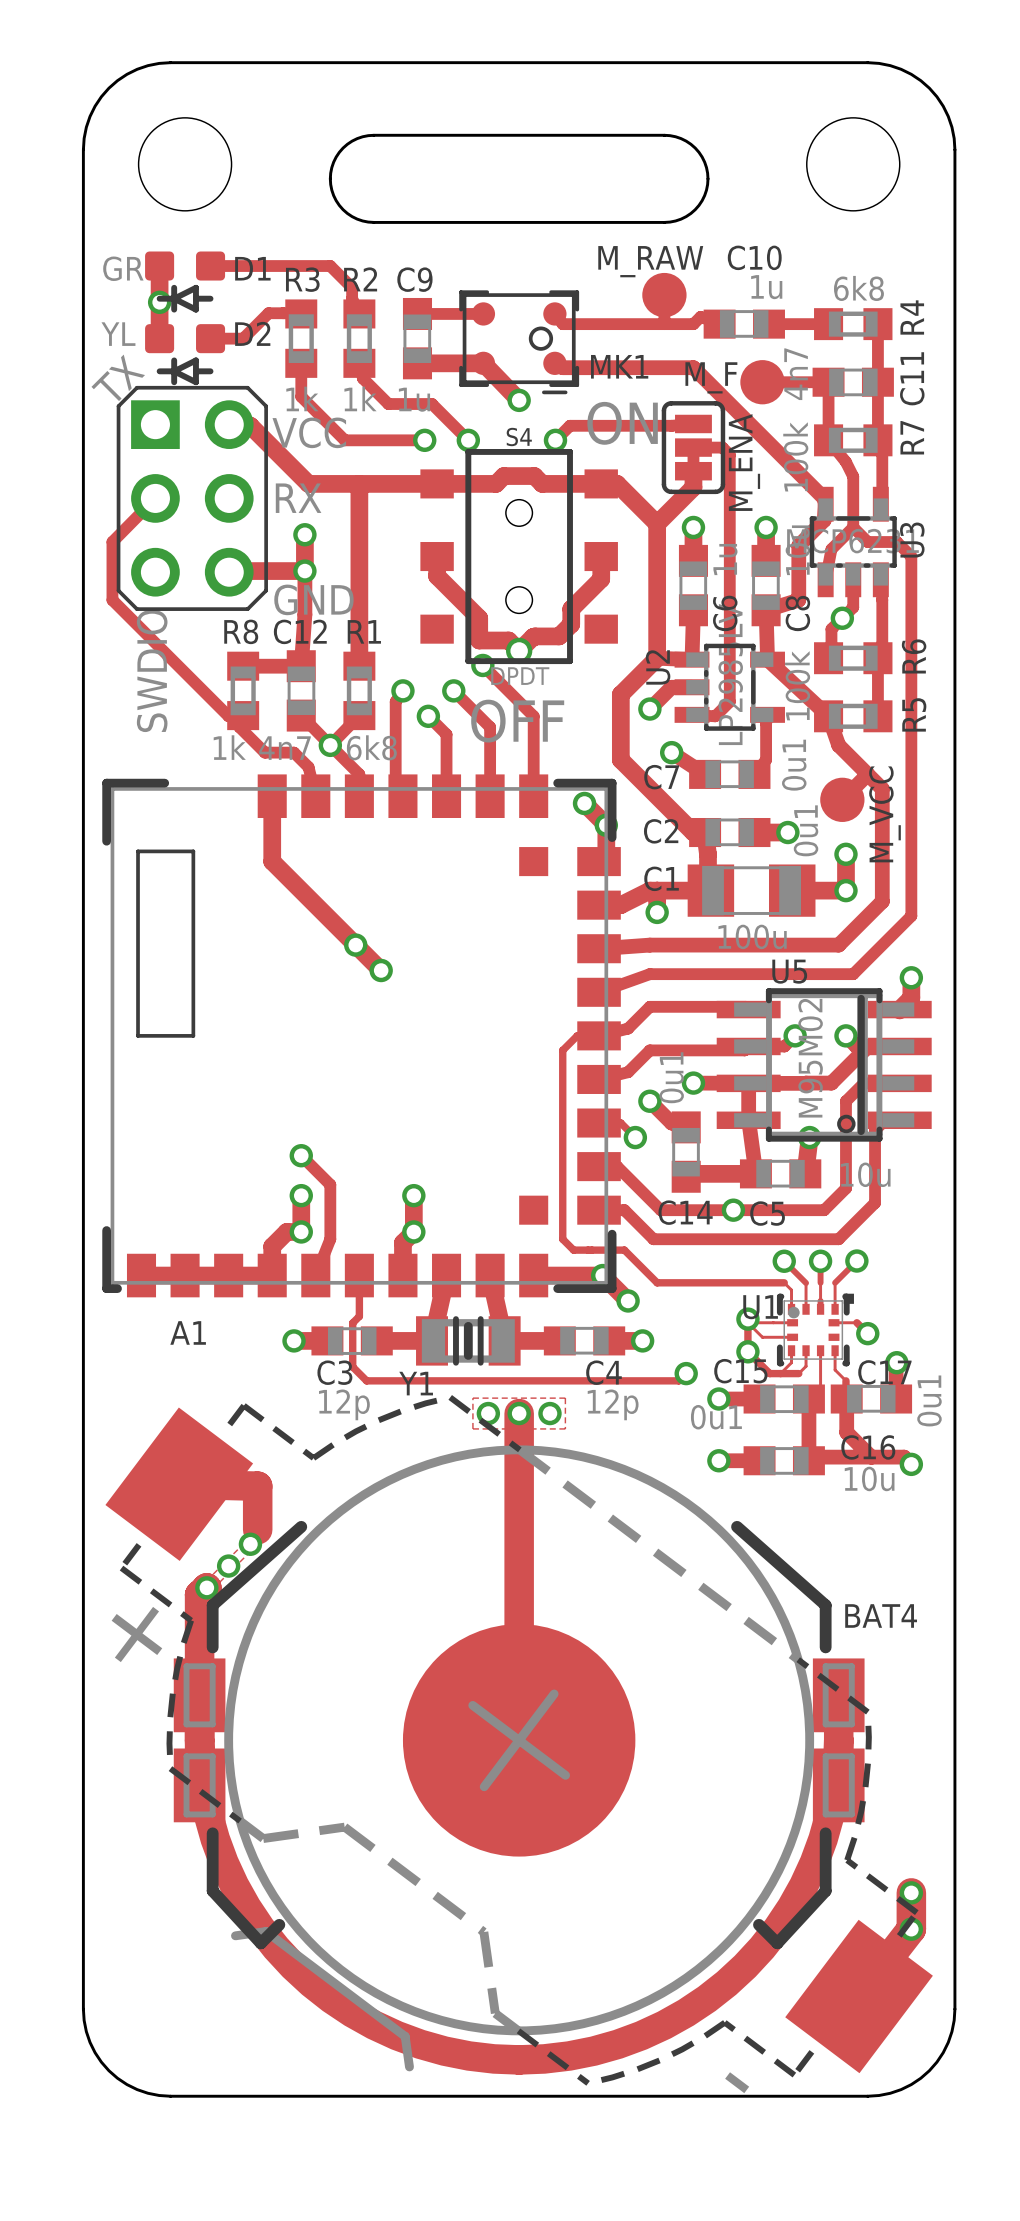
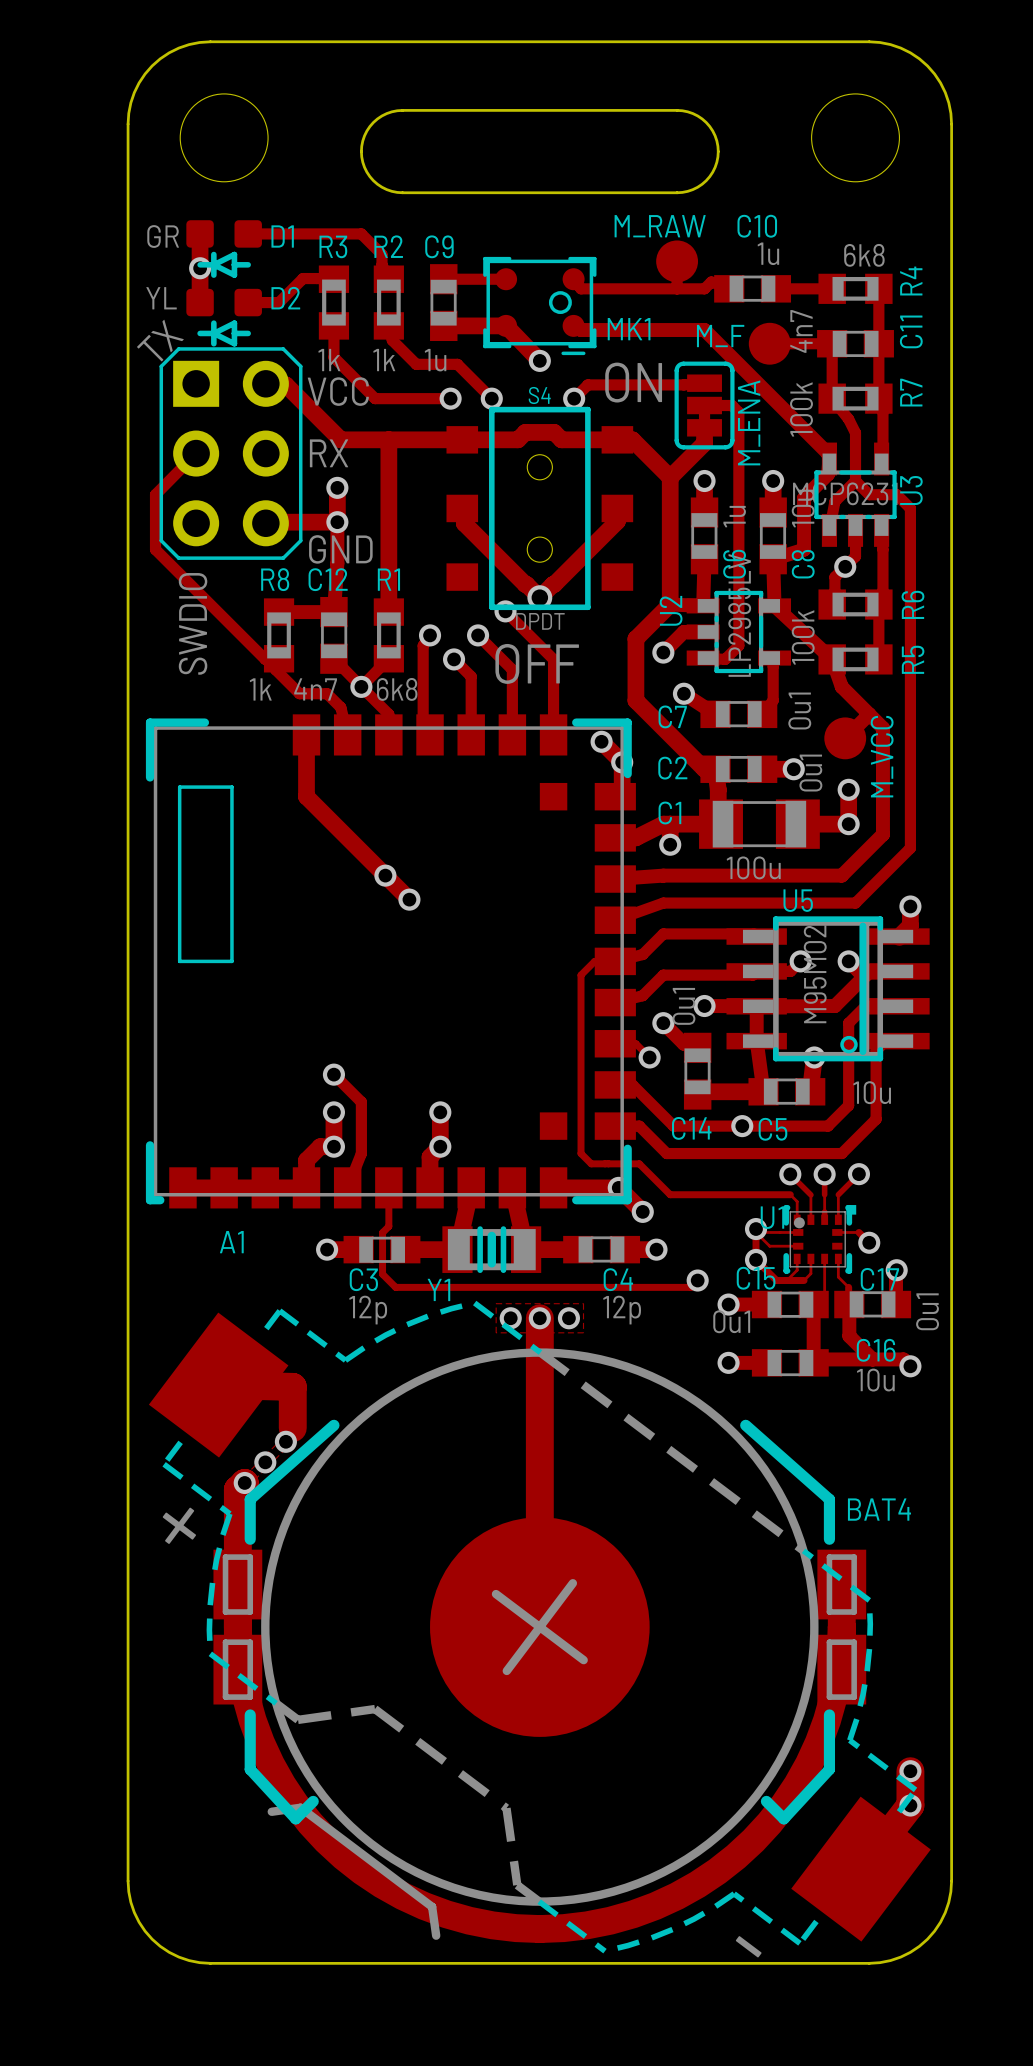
track: (437, 556) (437, 576) (479, 618) (479, 640) (508, 640) -> (464, 508) (464, 523) (529, 587)
track: (601, 570) (601, 579) (571, 609) (571, 624) (559, 636) (535, 636) -> (617, 521) (554, 583)

